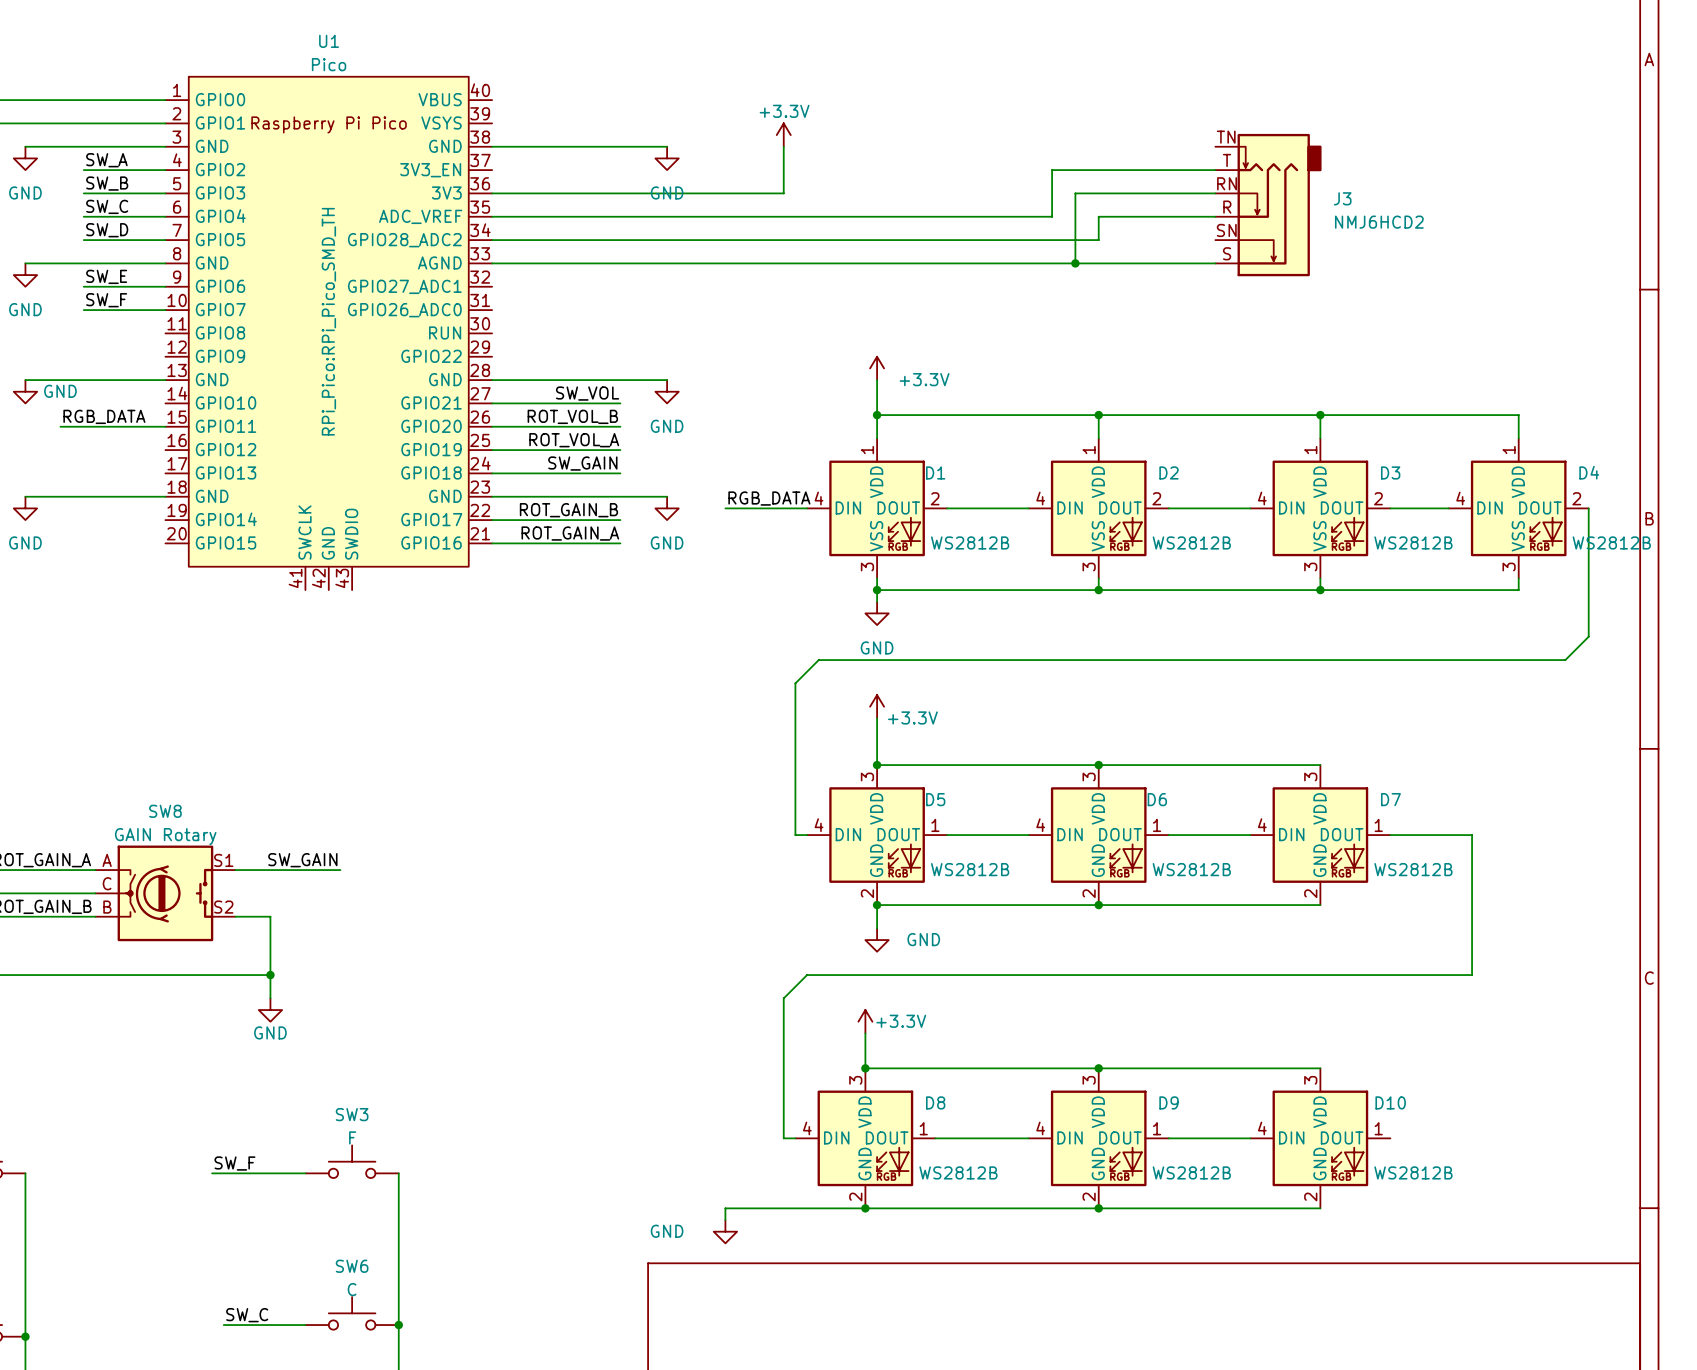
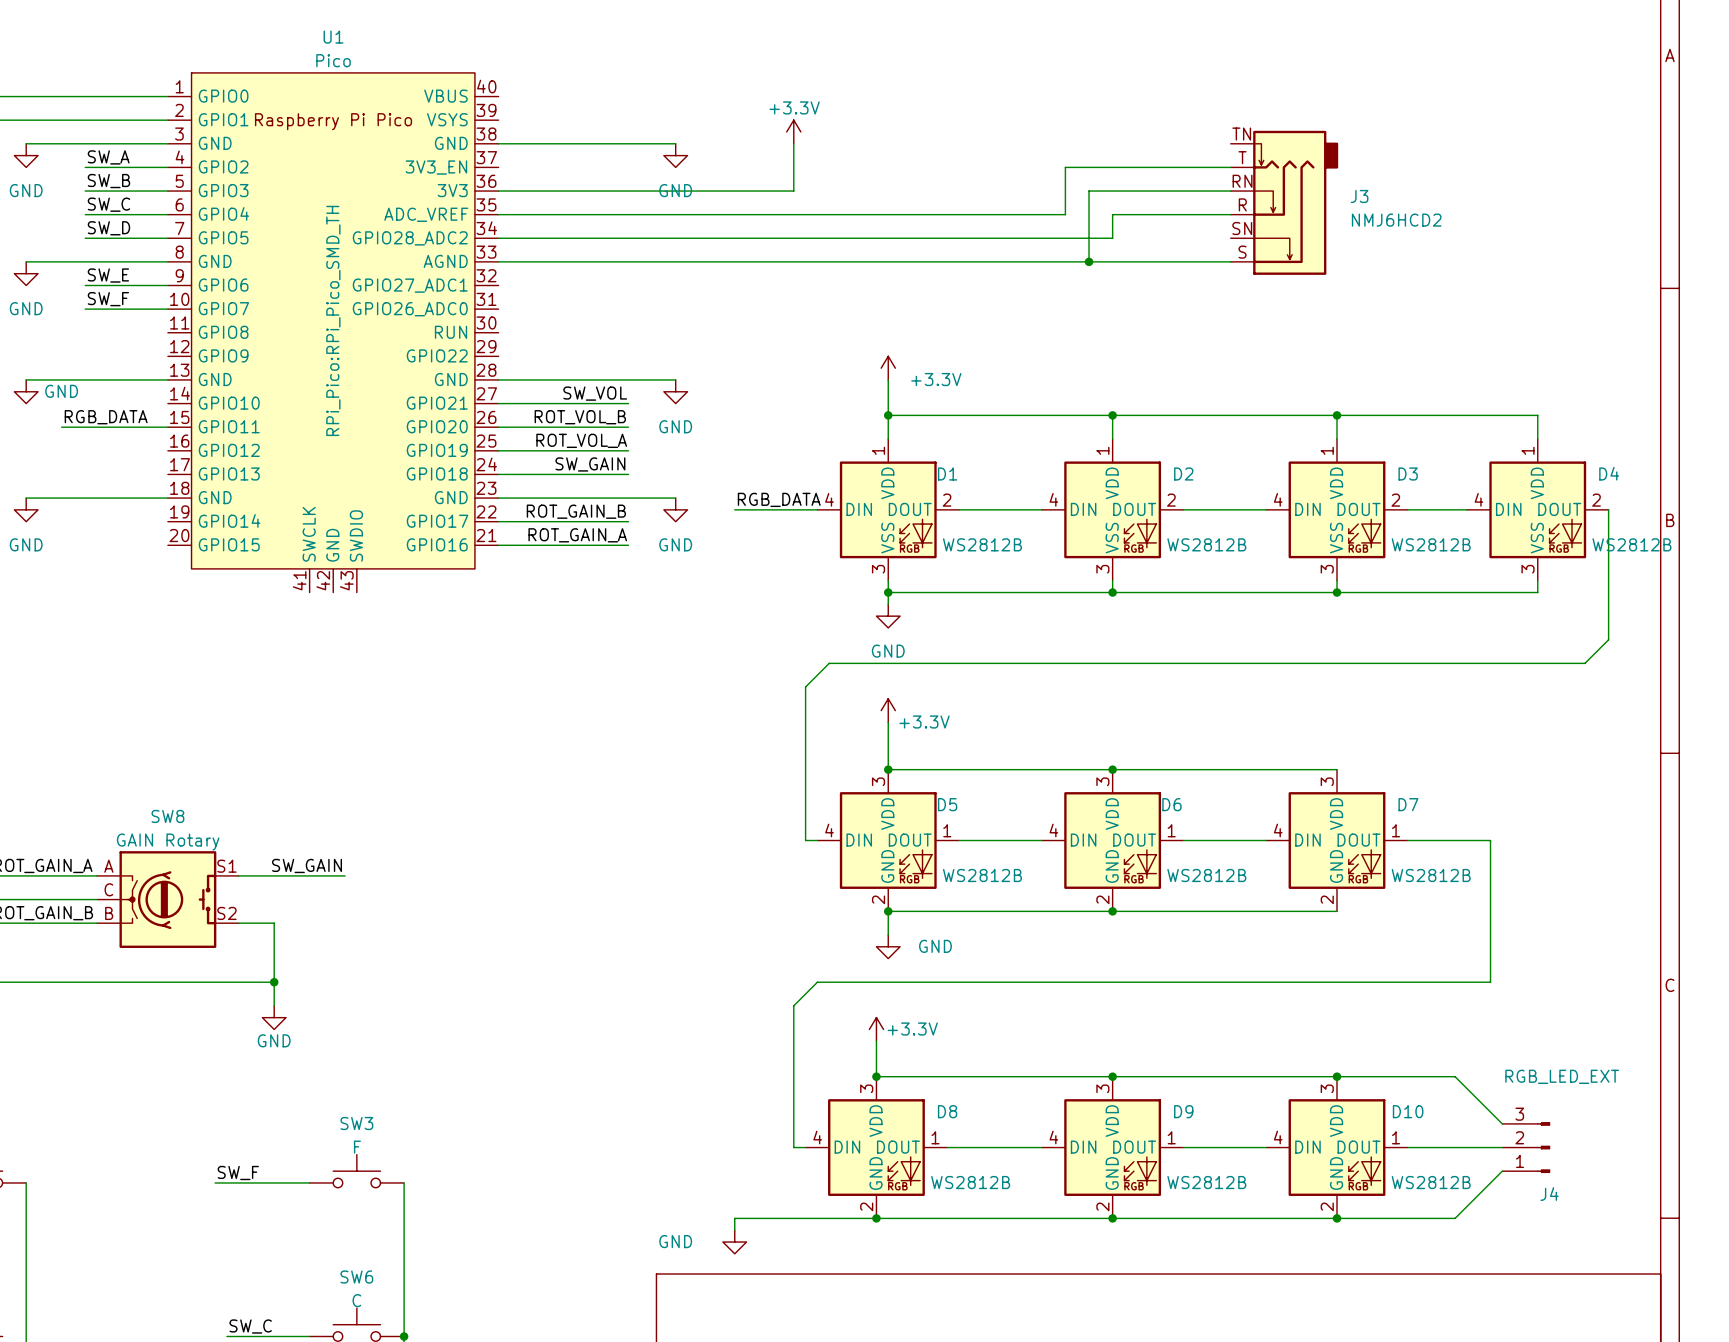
wire: none -> (1337, 1076) (1455, 1076) (1502, 1123)
junction: none -> (1337, 1076)
wire: none -> (1407, 1147) (1502, 1147)
J4: none -> RGB_LED_EXT (1526, 1147)
wire: none -> (1502, 1171) (1455, 1218) (1337, 1218)
junction: none -> (1337, 1218)

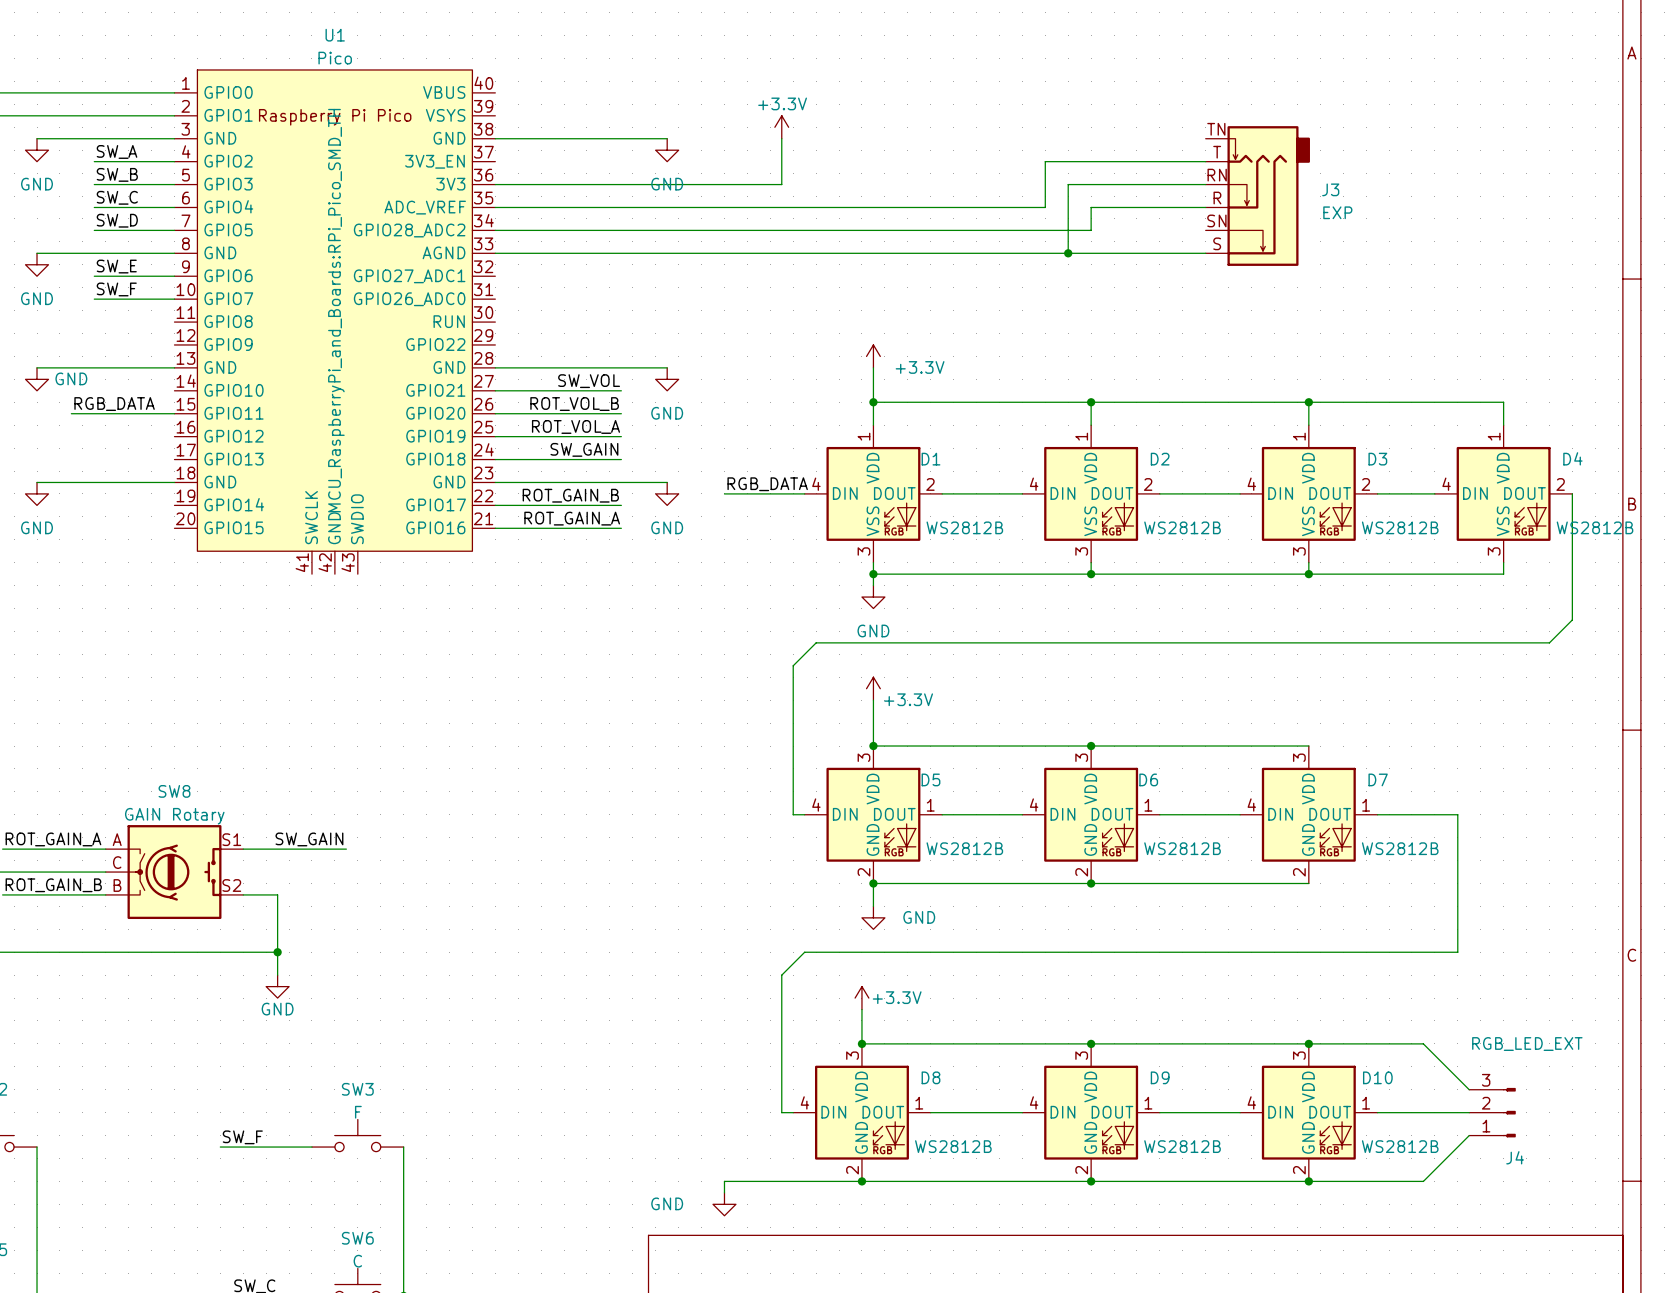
J3 value: NMJ6HCD2 (1396, 220) -> EXP (1337, 212)
U1 text: RPi_Pico:RPi_Pico_SMD_TH (333, 320) -> MCU_RaspberryPi_and_Boards:RPi_Pico_SMD_TH (336, 310)

